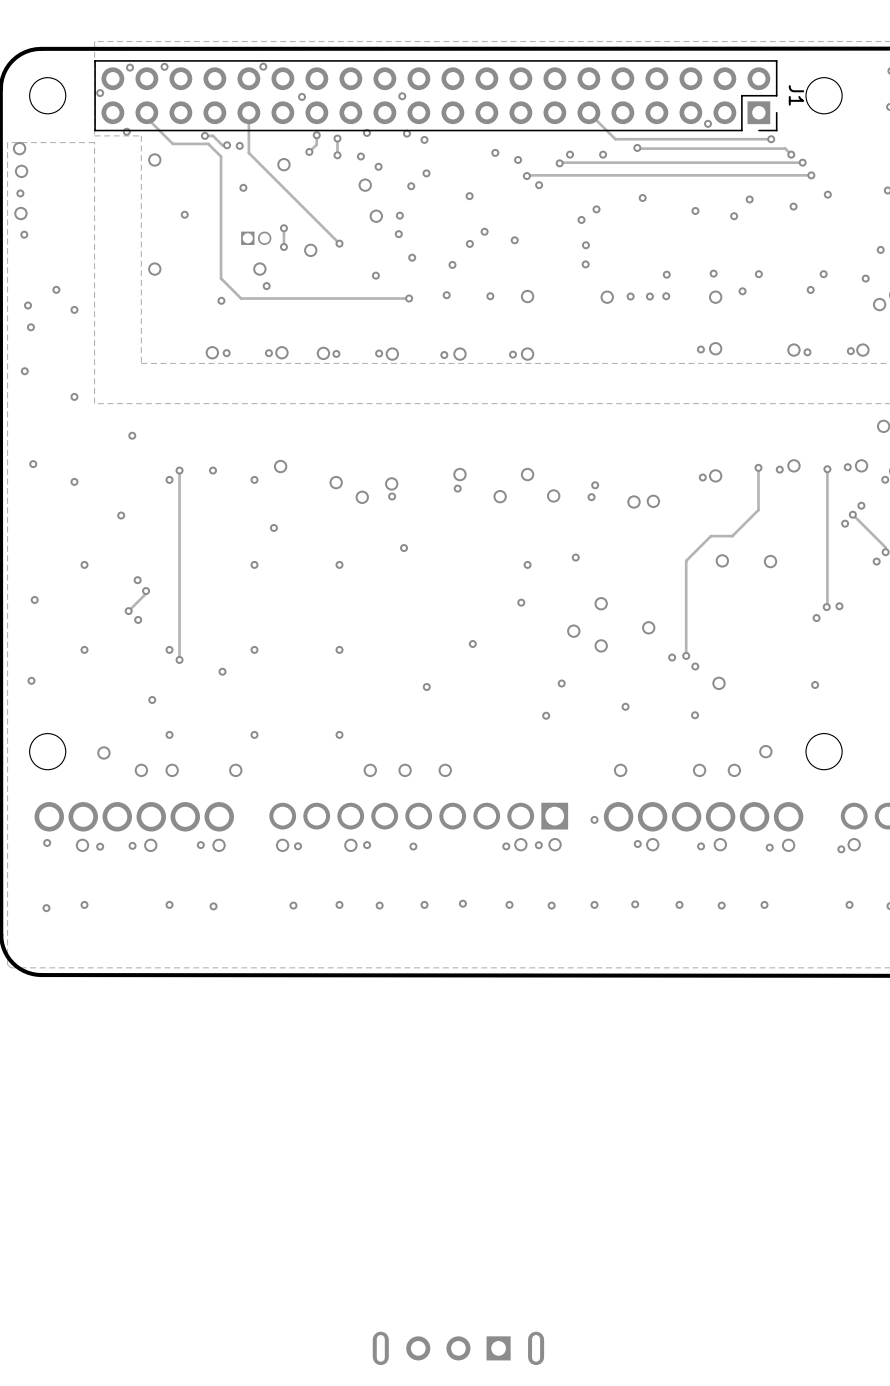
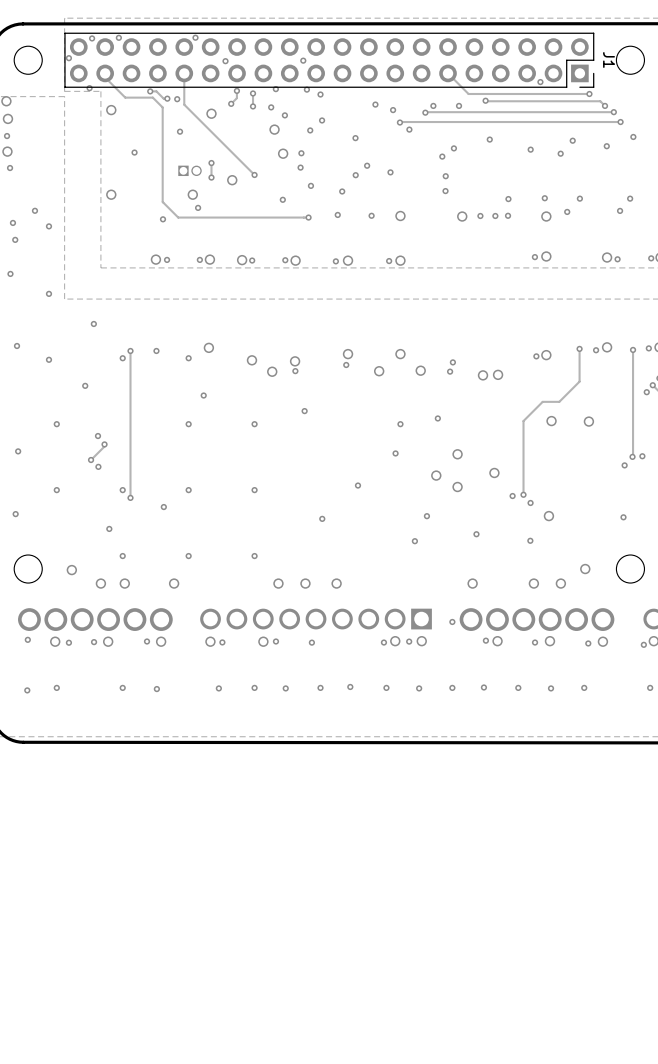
part: (458, 1348) -> none

